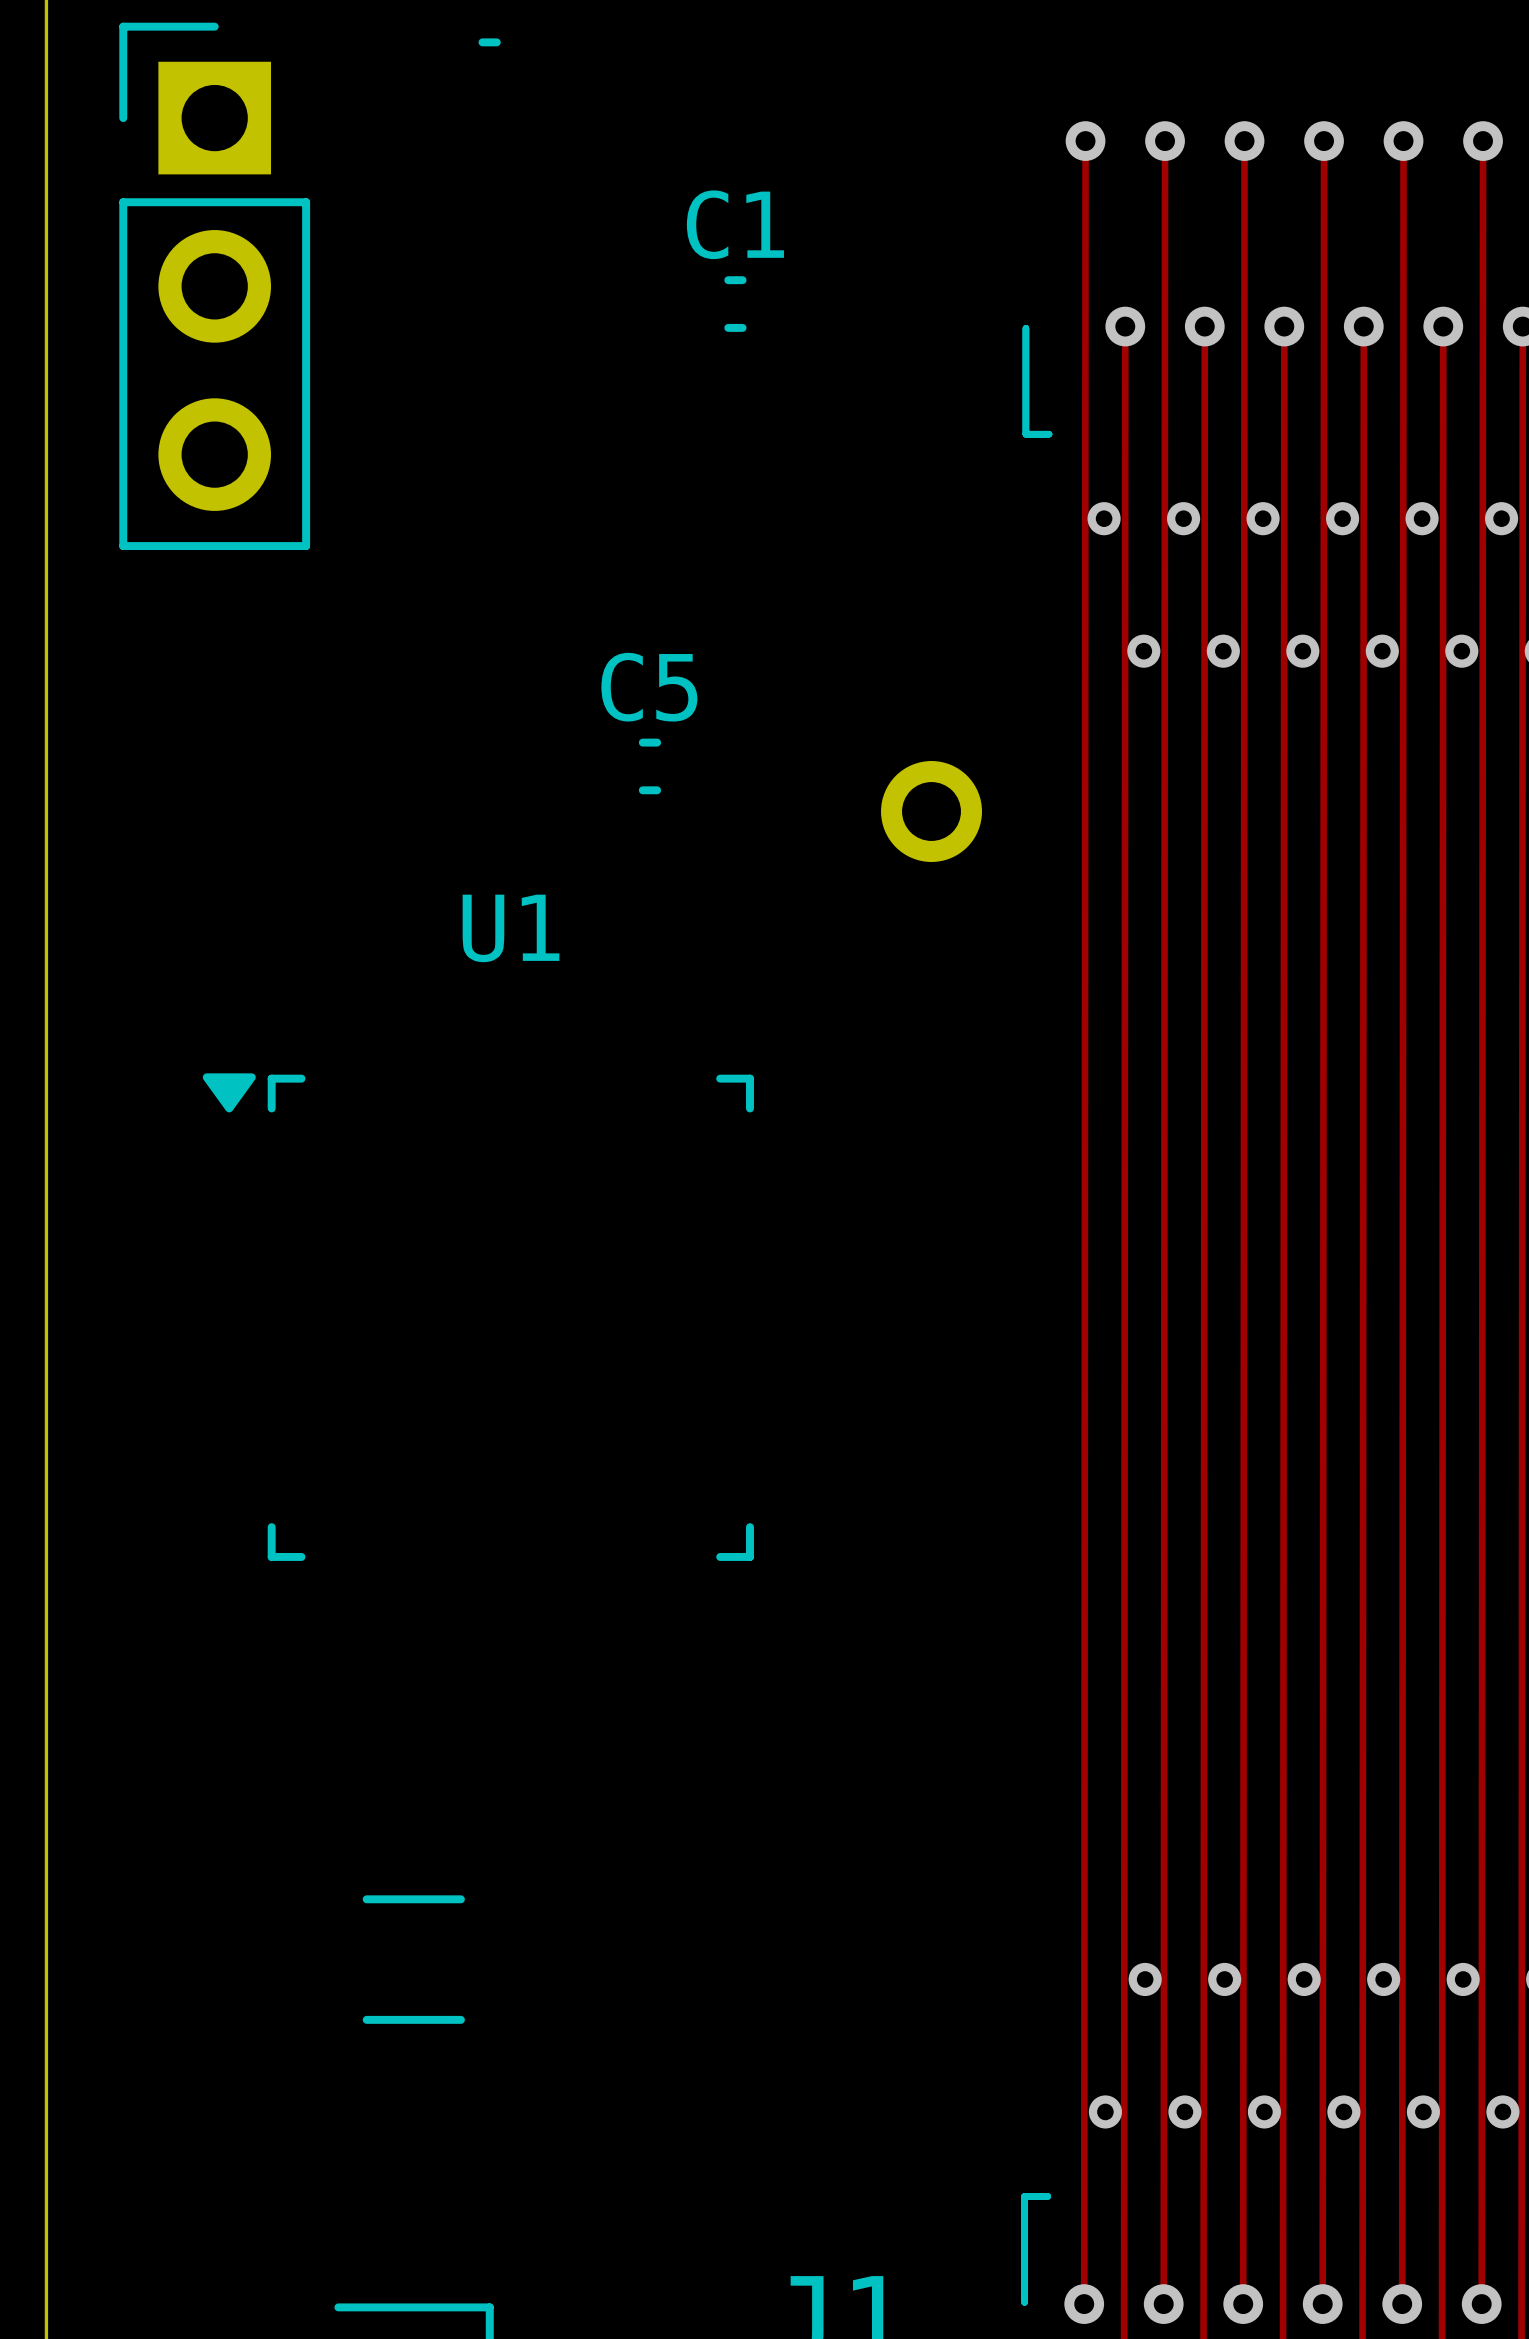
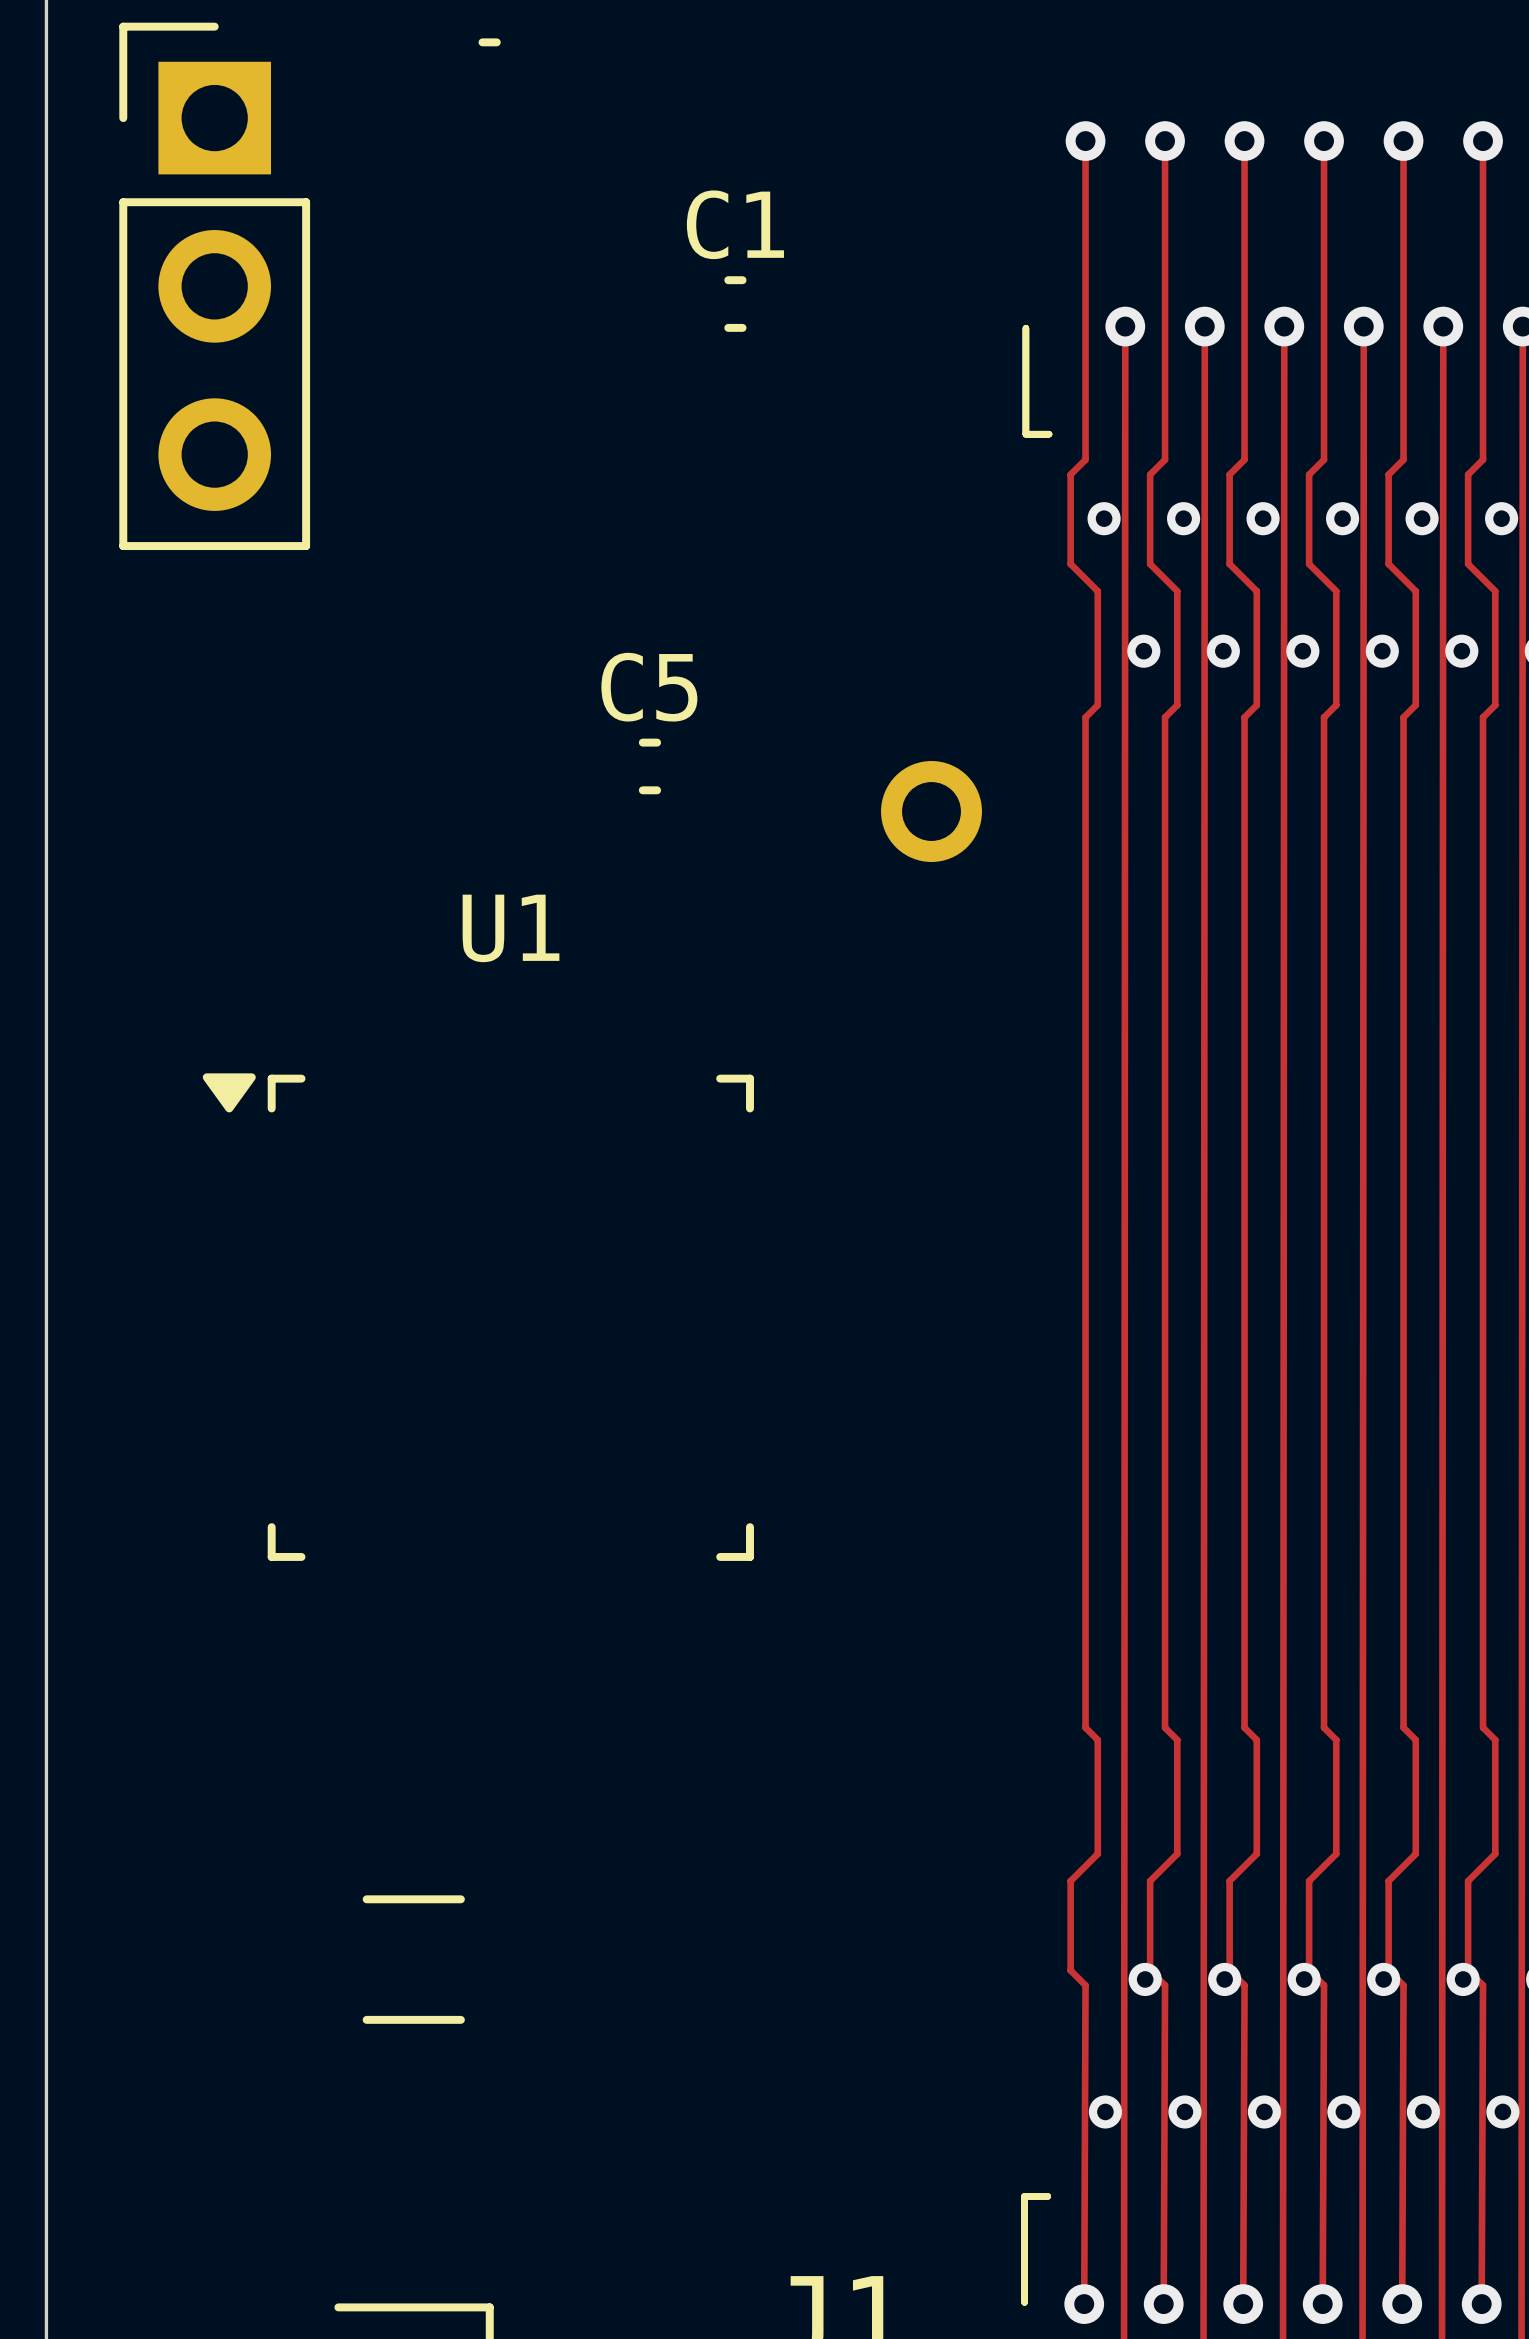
track: (1085, 141) (1084, 2304) -> (1085, 141) (1085, 459) (1070, 474) (1070, 564) (1097, 591) (1097, 705) (1085, 717) (1085, 1727) (1097, 1739) (1097, 1853) (1070, 1881) (1070, 1970) (1085, 1985) (1084, 2304)
track: (1165, 141) (1163, 2304) -> (1165, 141) (1165, 459) (1150, 474) (1150, 564) (1177, 591) (1177, 705) (1165, 717) (1165, 1727) (1177, 1739) (1177, 1853) (1150, 1881) (1150, 1970) (1165, 1985) (1163, 2304)
track: (1244, 141) (1243, 2304) -> (1244, 141) (1244, 459) (1229, 474) (1229, 564) (1256, 591) (1256, 705) (1244, 717) (1244, 1727) (1256, 1739) (1256, 1853) (1229, 1881) (1229, 1970) (1244, 1985) (1243, 2304)
track: (1324, 141) (1322, 2304) -> (1324, 141) (1324, 459) (1309, 474) (1309, 564) (1336, 591) (1336, 705) (1324, 717) (1324, 1727) (1336, 1739) (1336, 1853) (1309, 1881) (1309, 1970) (1324, 1985) (1322, 2304)
track: (1403, 141) (1402, 2304) -> (1403, 141) (1403, 459) (1388, 474) (1388, 564) (1415, 591) (1415, 705) (1403, 717) (1403, 1727) (1415, 1739) (1415, 1853) (1388, 1881) (1388, 1970) (1403, 1985) (1402, 2304)
track: (1483, 141) (1481, 2304) -> (1483, 141) (1483, 459) (1468, 474) (1468, 564) (1495, 591) (1495, 705) (1483, 717) (1483, 1727) (1495, 1739) (1495, 1853) (1468, 1881) (1468, 1970) (1483, 1985) (1481, 2304)

